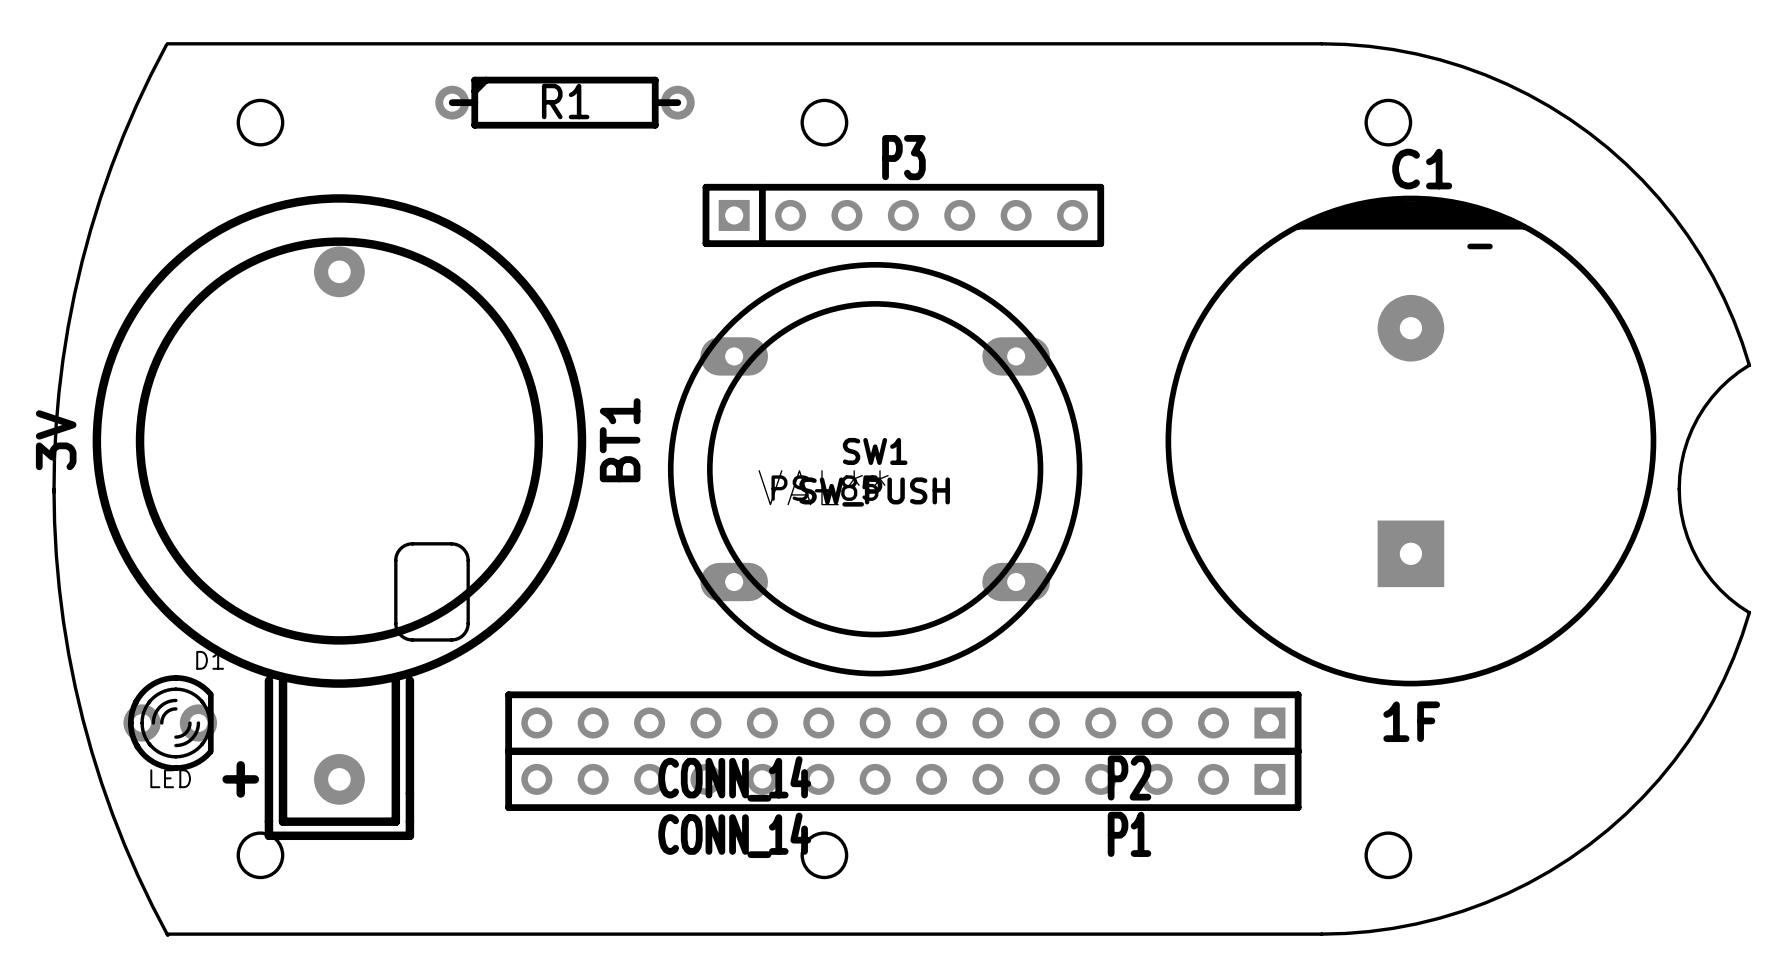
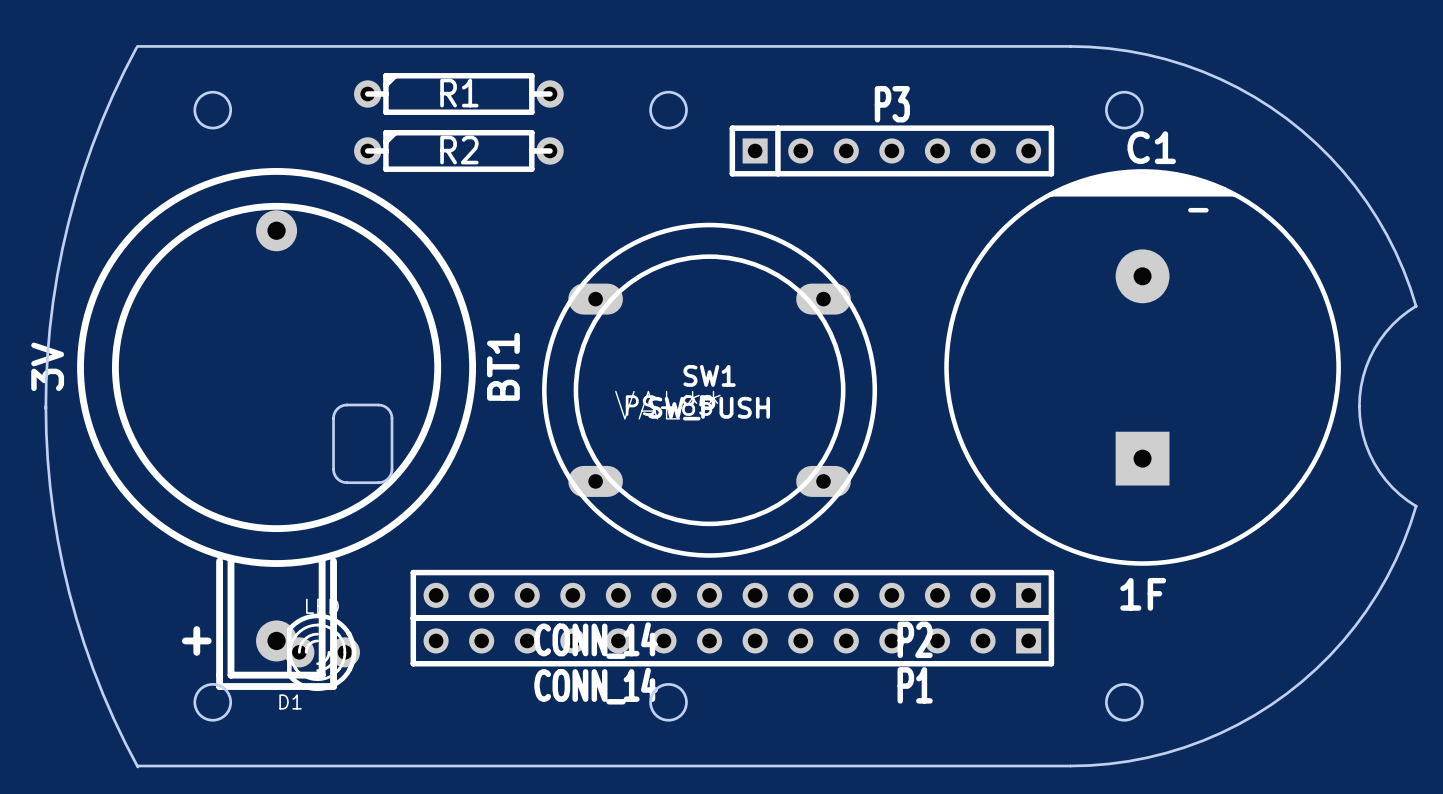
R2: none -> (458, 150)
P3 position: (903, 215) -> (891, 150)
part position: (431, 591) -> (362, 443)
D1 rotation: 0° (170, 722) -> 180° (322, 652)
D1 position: (170, 722) -> (322, 652)

